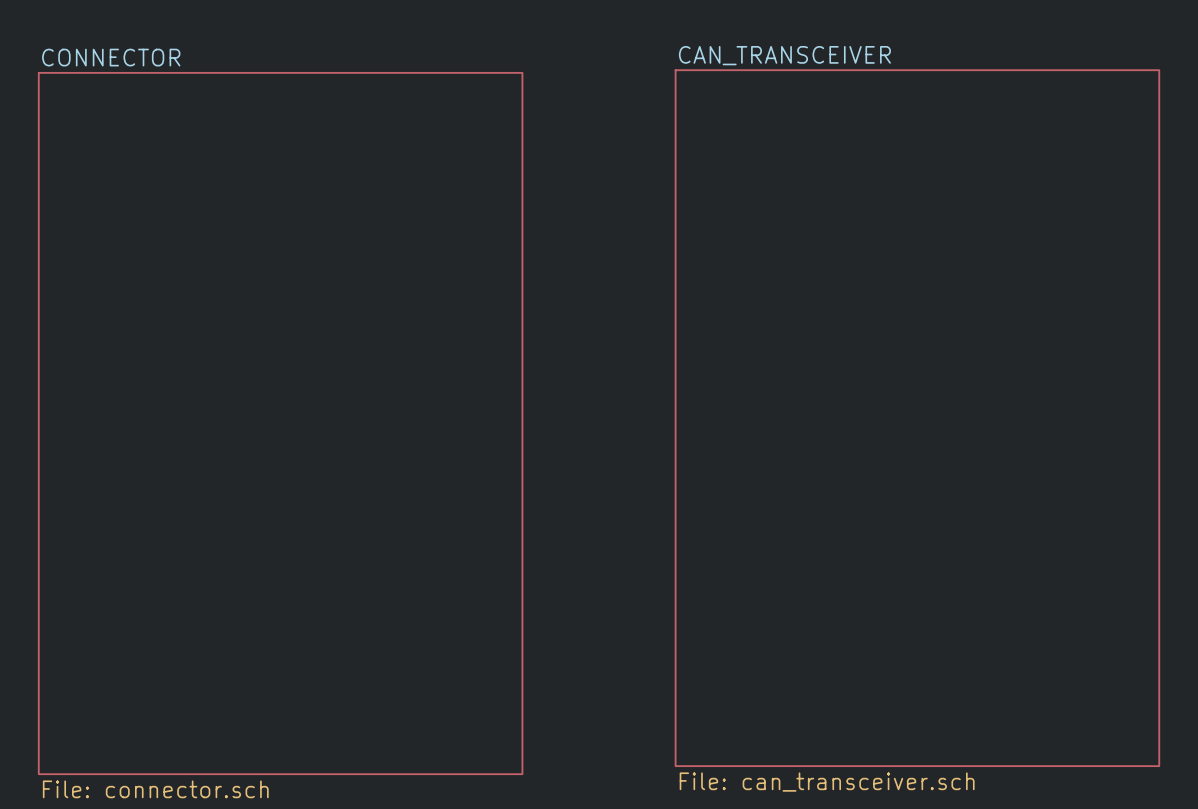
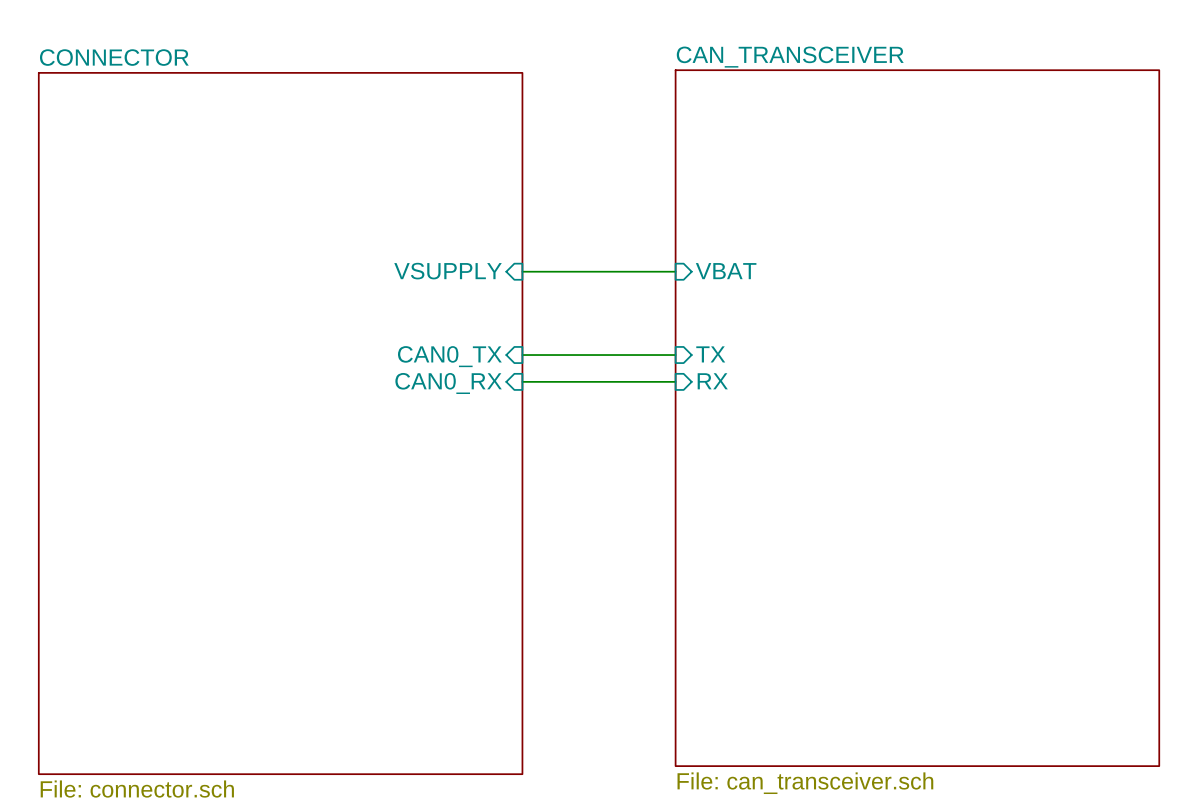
sheet pin: none -> VSUPPLY (448, 271)
wire: none -> (522, 271) (675, 271)
sheet pin: none -> VBAT (726, 271)
sheet pin: none -> TX (710, 354)
sheet pin: none -> CAN0_TX (449, 356)
wire: none -> (522, 355) (675, 355)
wire: none -> (522, 381) (675, 381)
sheet pin: none -> RX (712, 381)
sheet pin: none -> CAN0_RX (448, 383)

